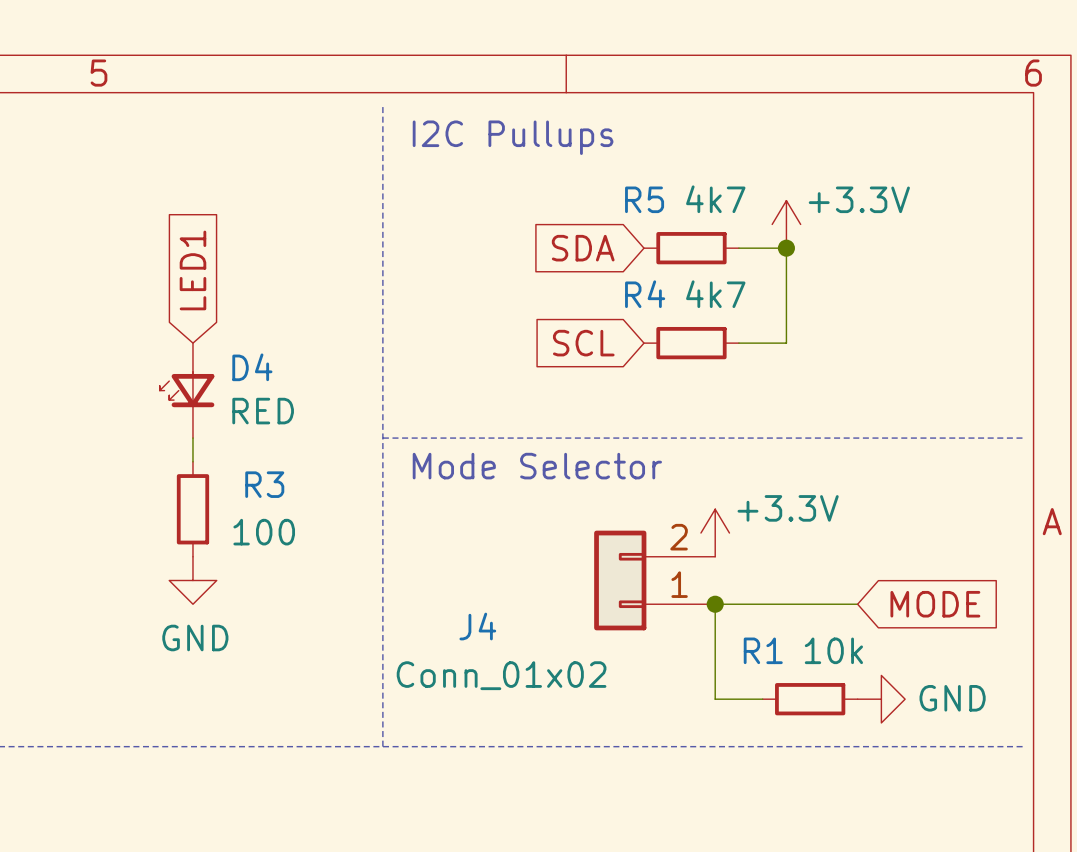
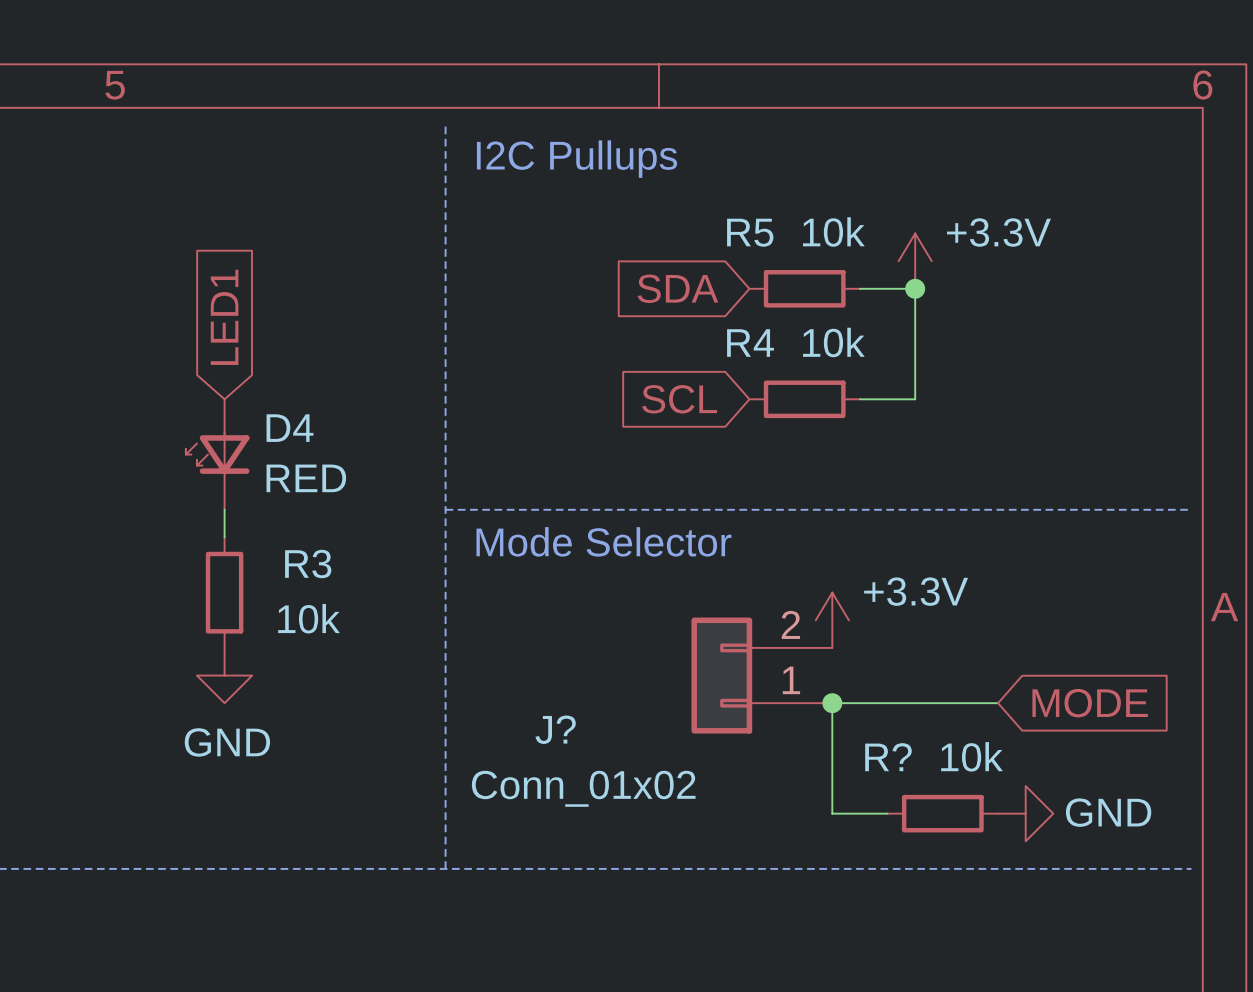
R5 value: 4k7 (715, 199) -> 10k (833, 231)
R4 value: 4k7 (715, 294) -> 10k (833, 342)
R3 value: 100 (264, 532) -> 10k (309, 618)
J4 name: J4 (477, 626) -> J? (555, 729)
R1 name: R1 (763, 650) -> R? (888, 757)

